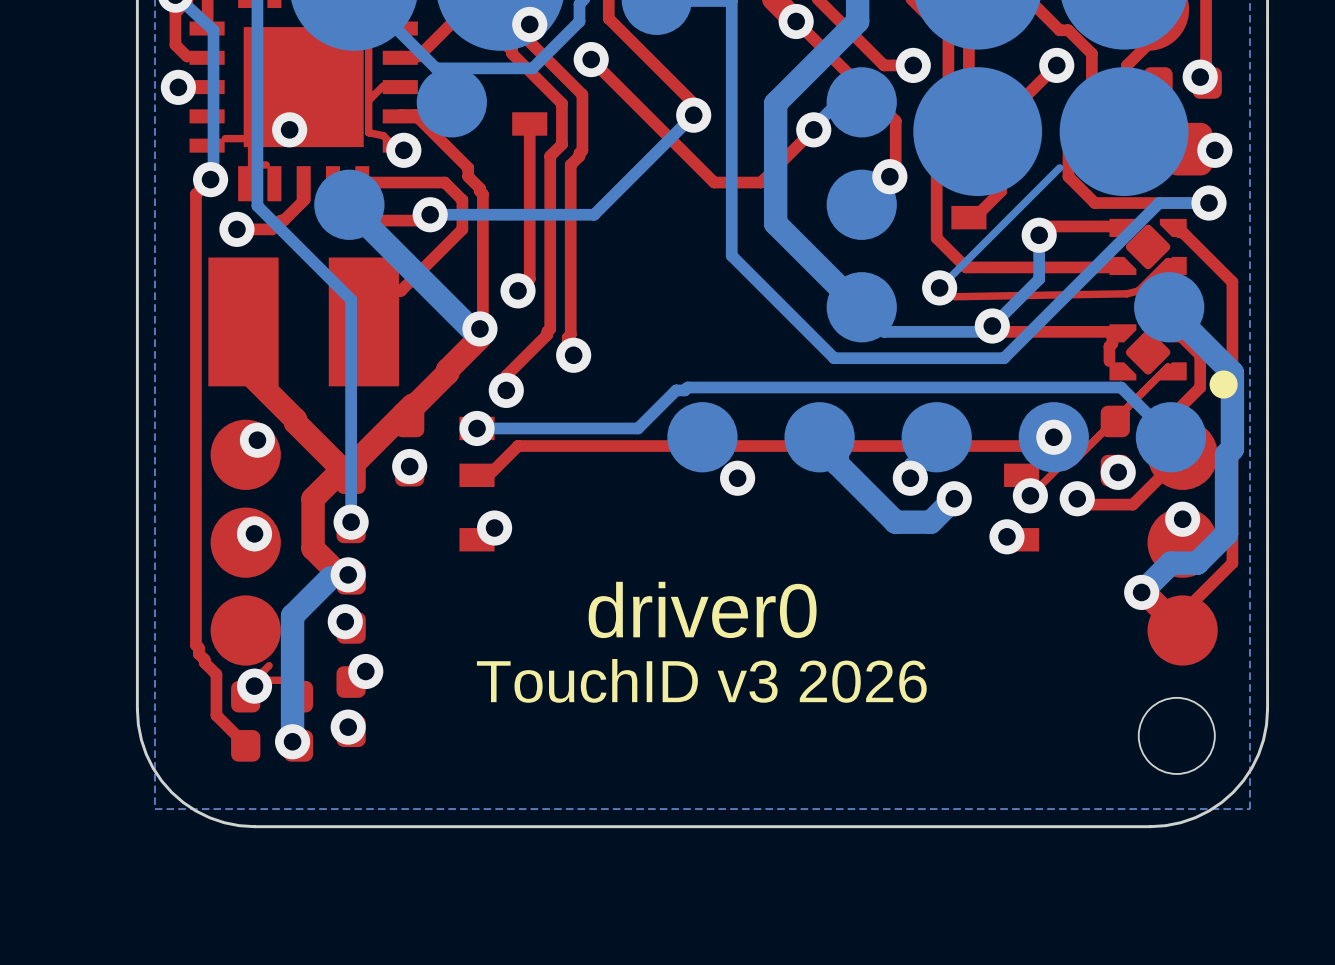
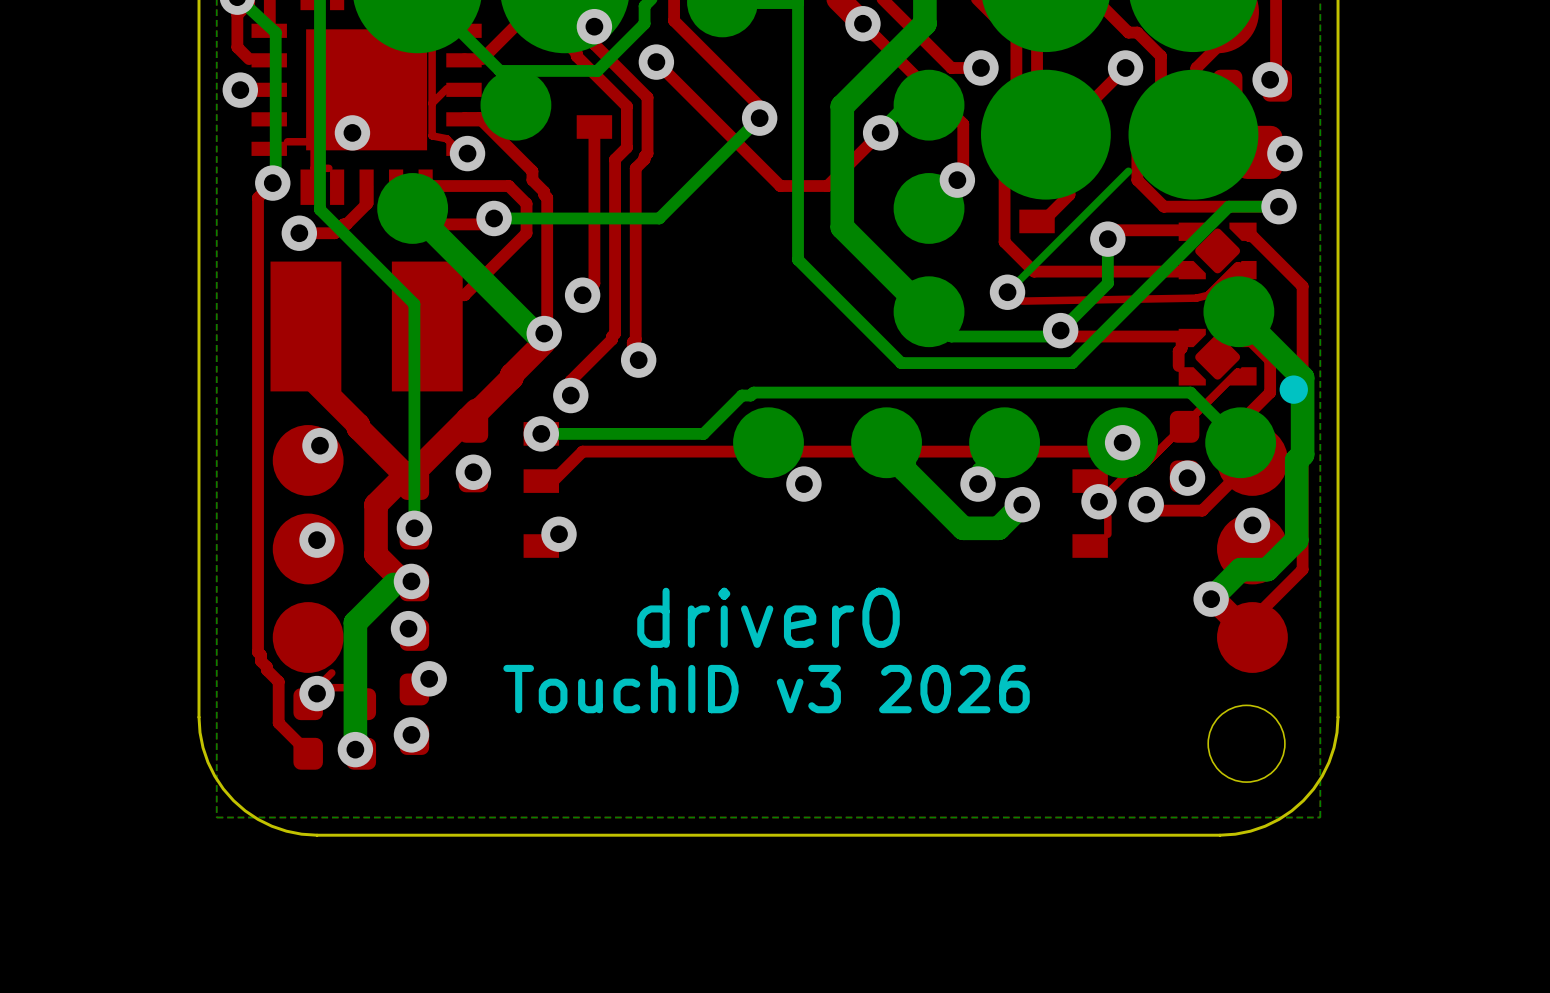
top track: none -> (1107, 516) (1107, 534)
via: (1006, 536) -> none

